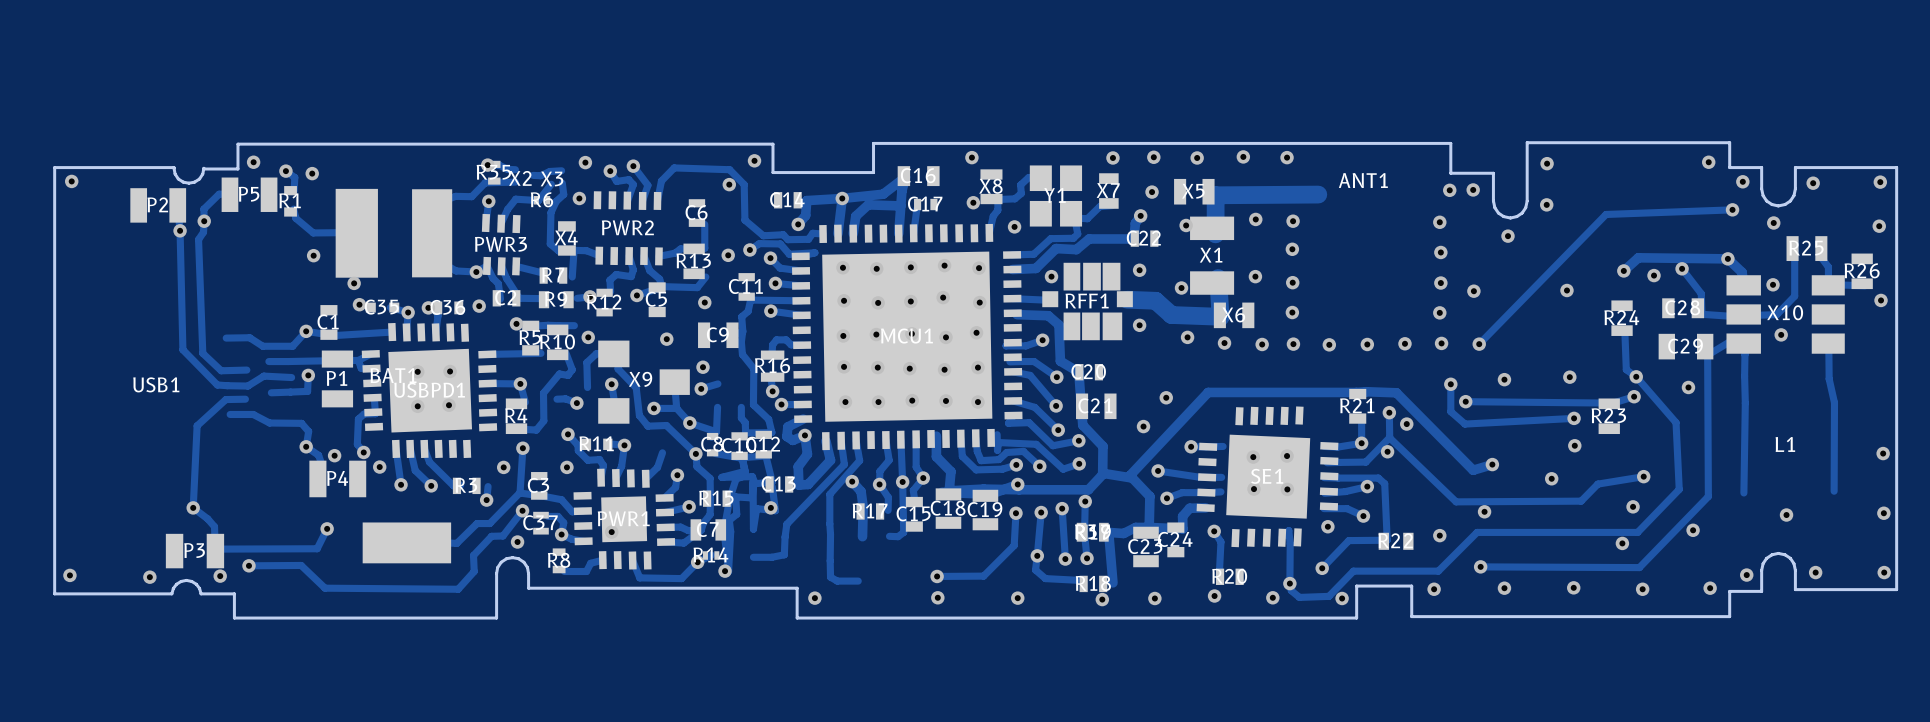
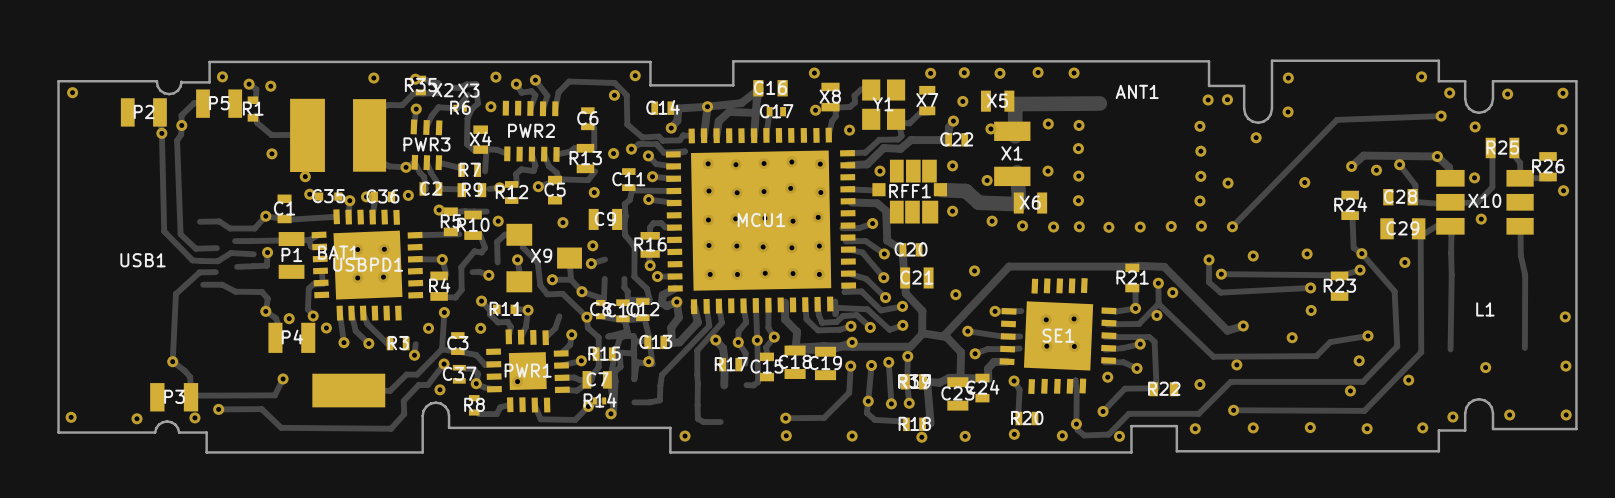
via: none -> (373, 78)

